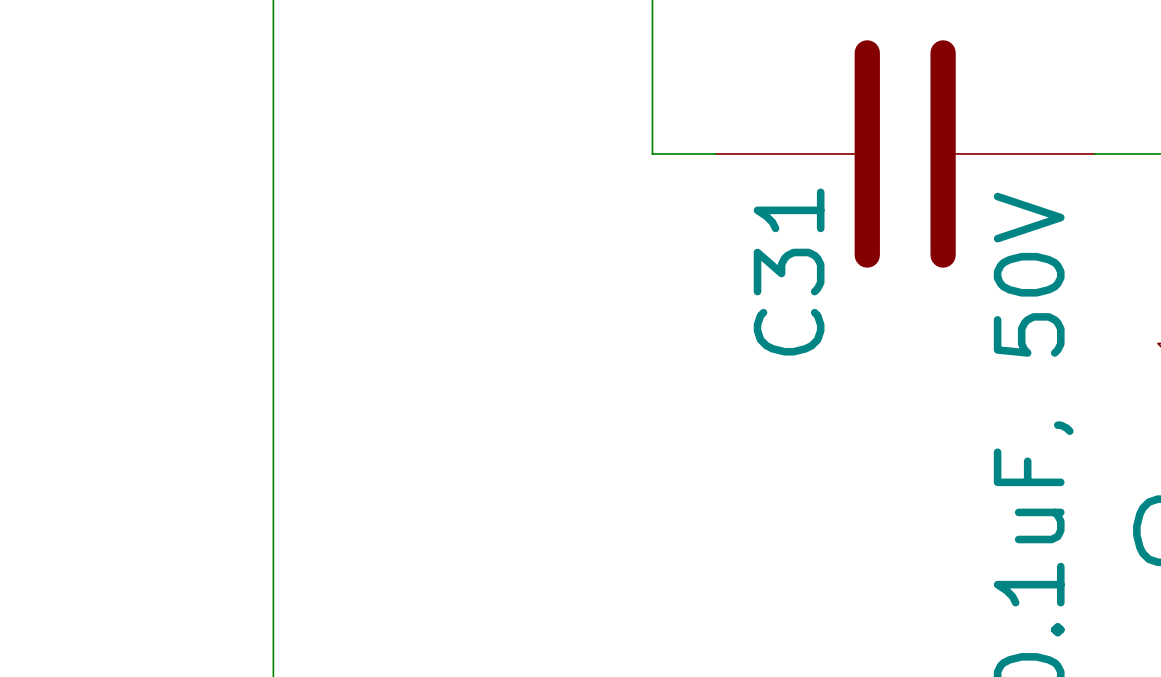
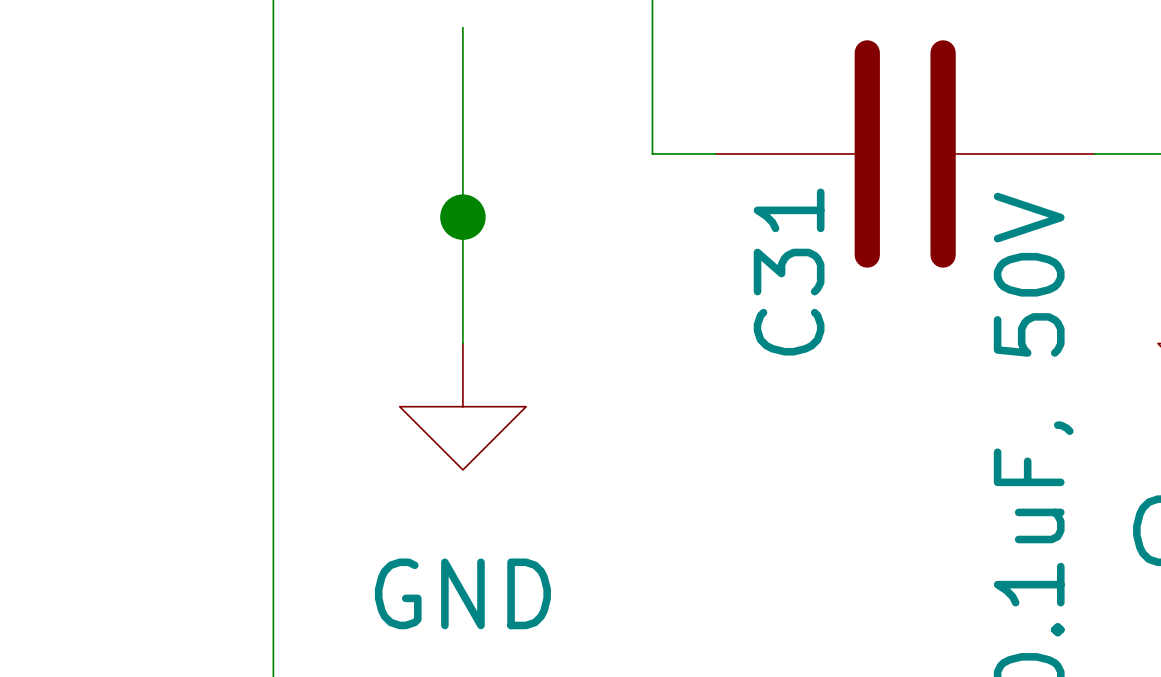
wire: none -> (462, 27) (462, 343)
junction: none -> (462, 217)
power symbol: none -> GND (462, 406)

